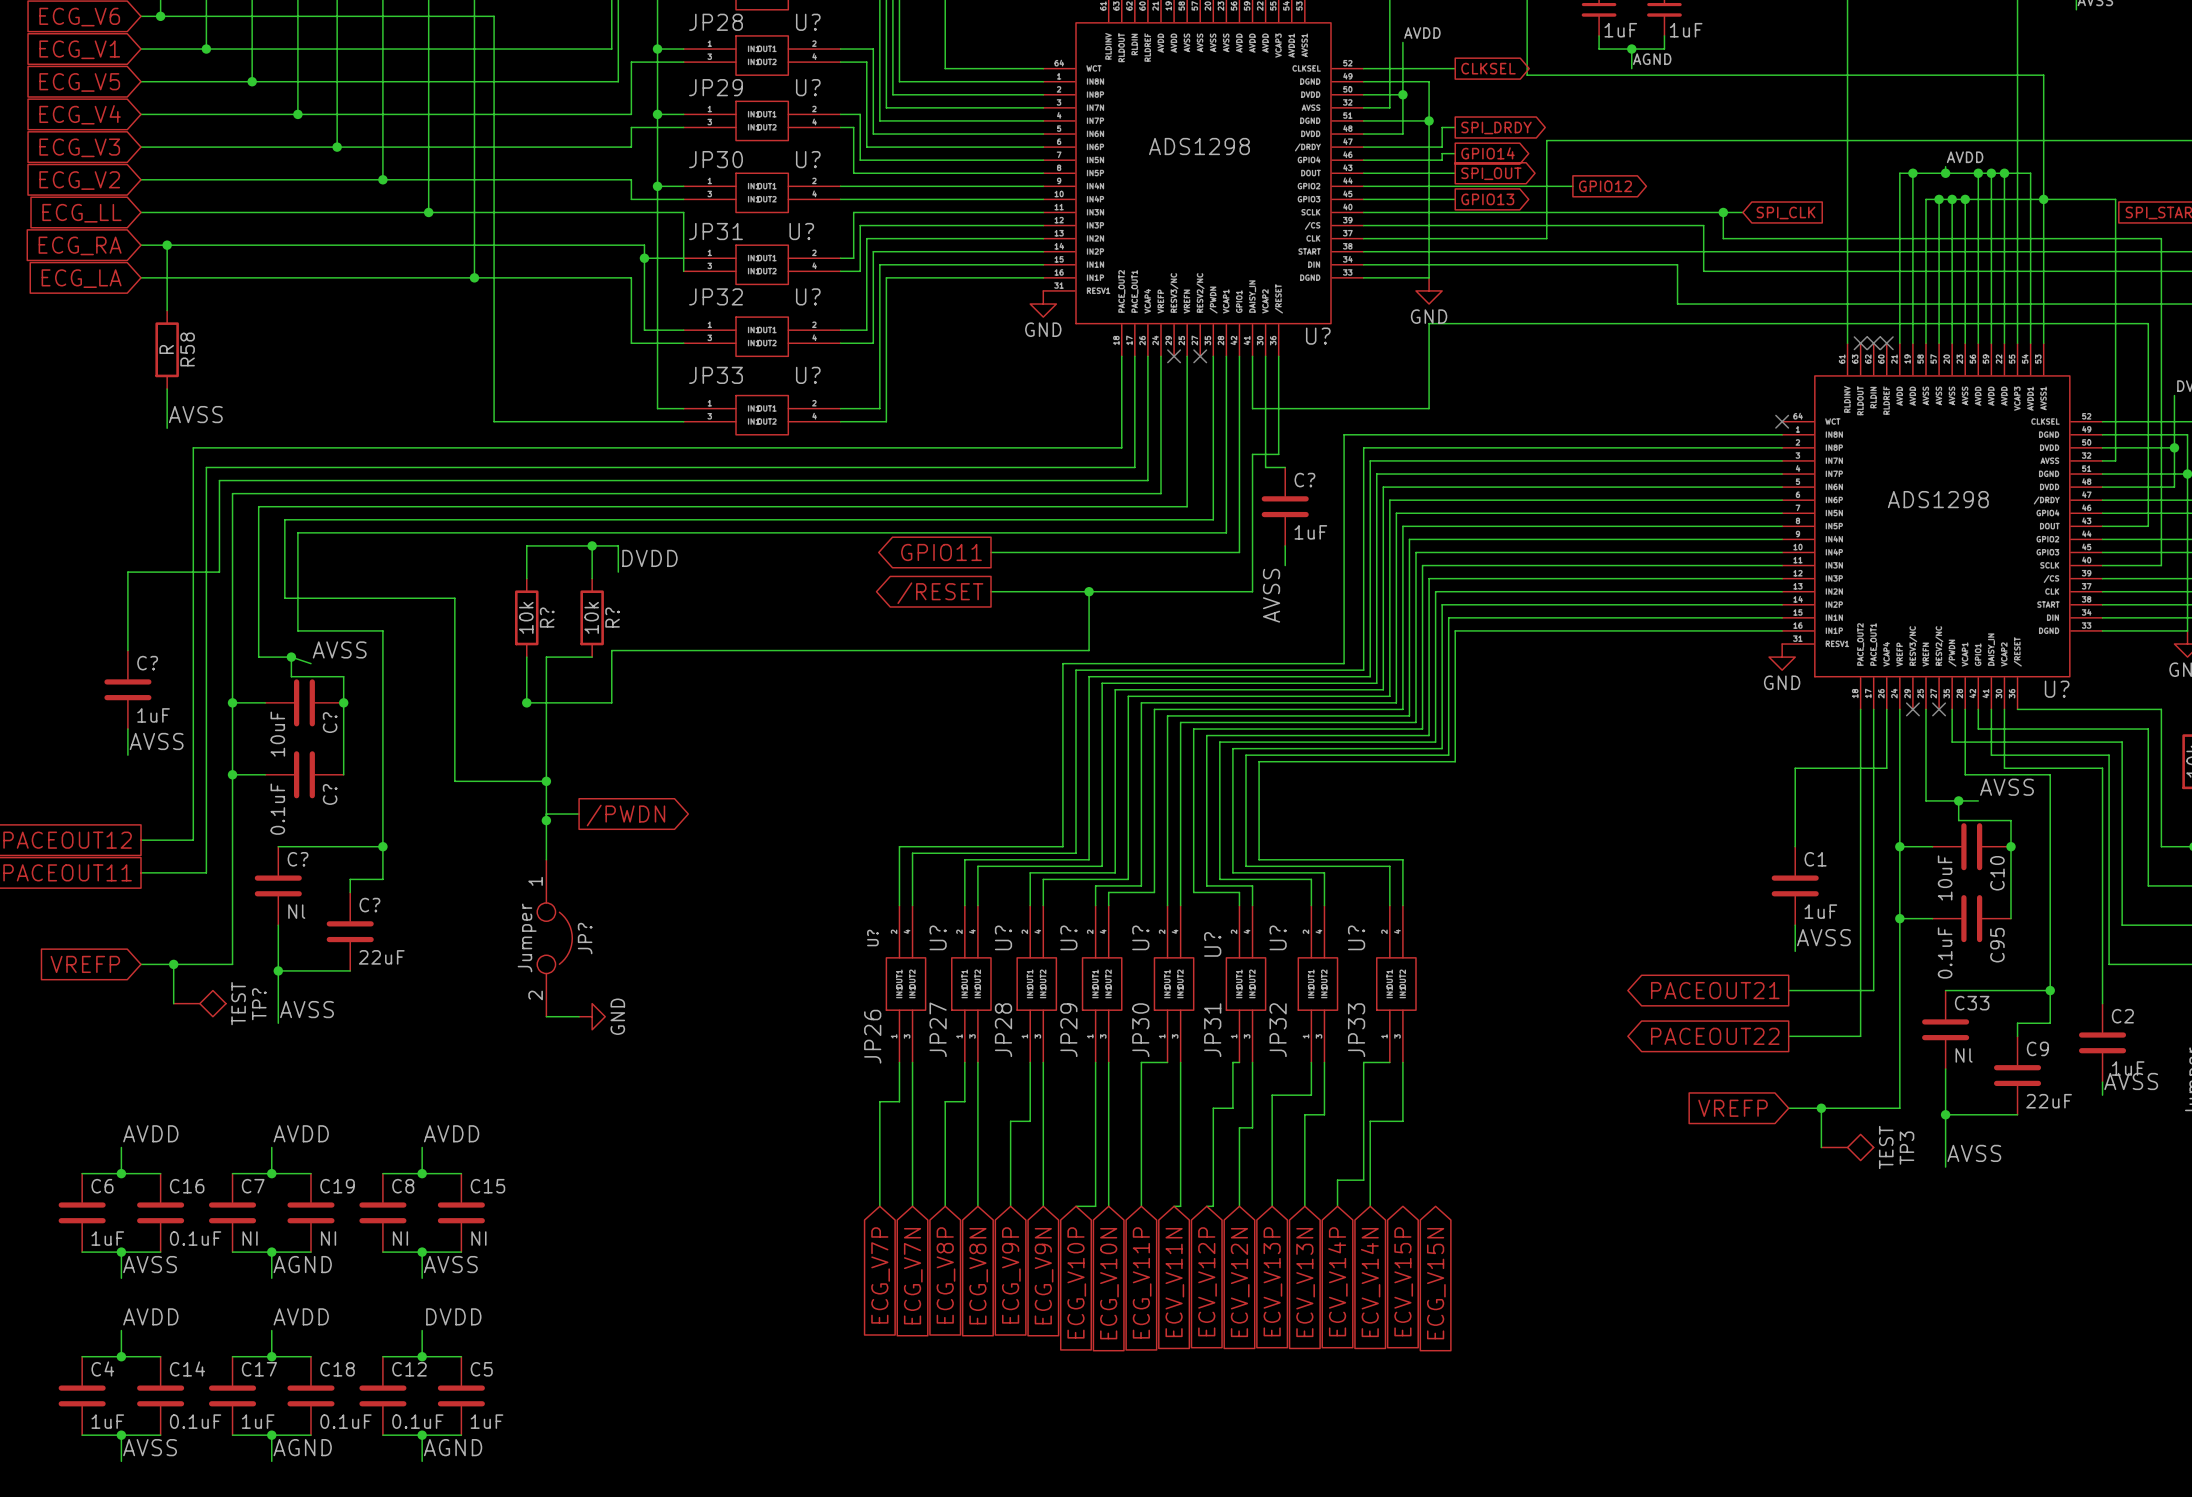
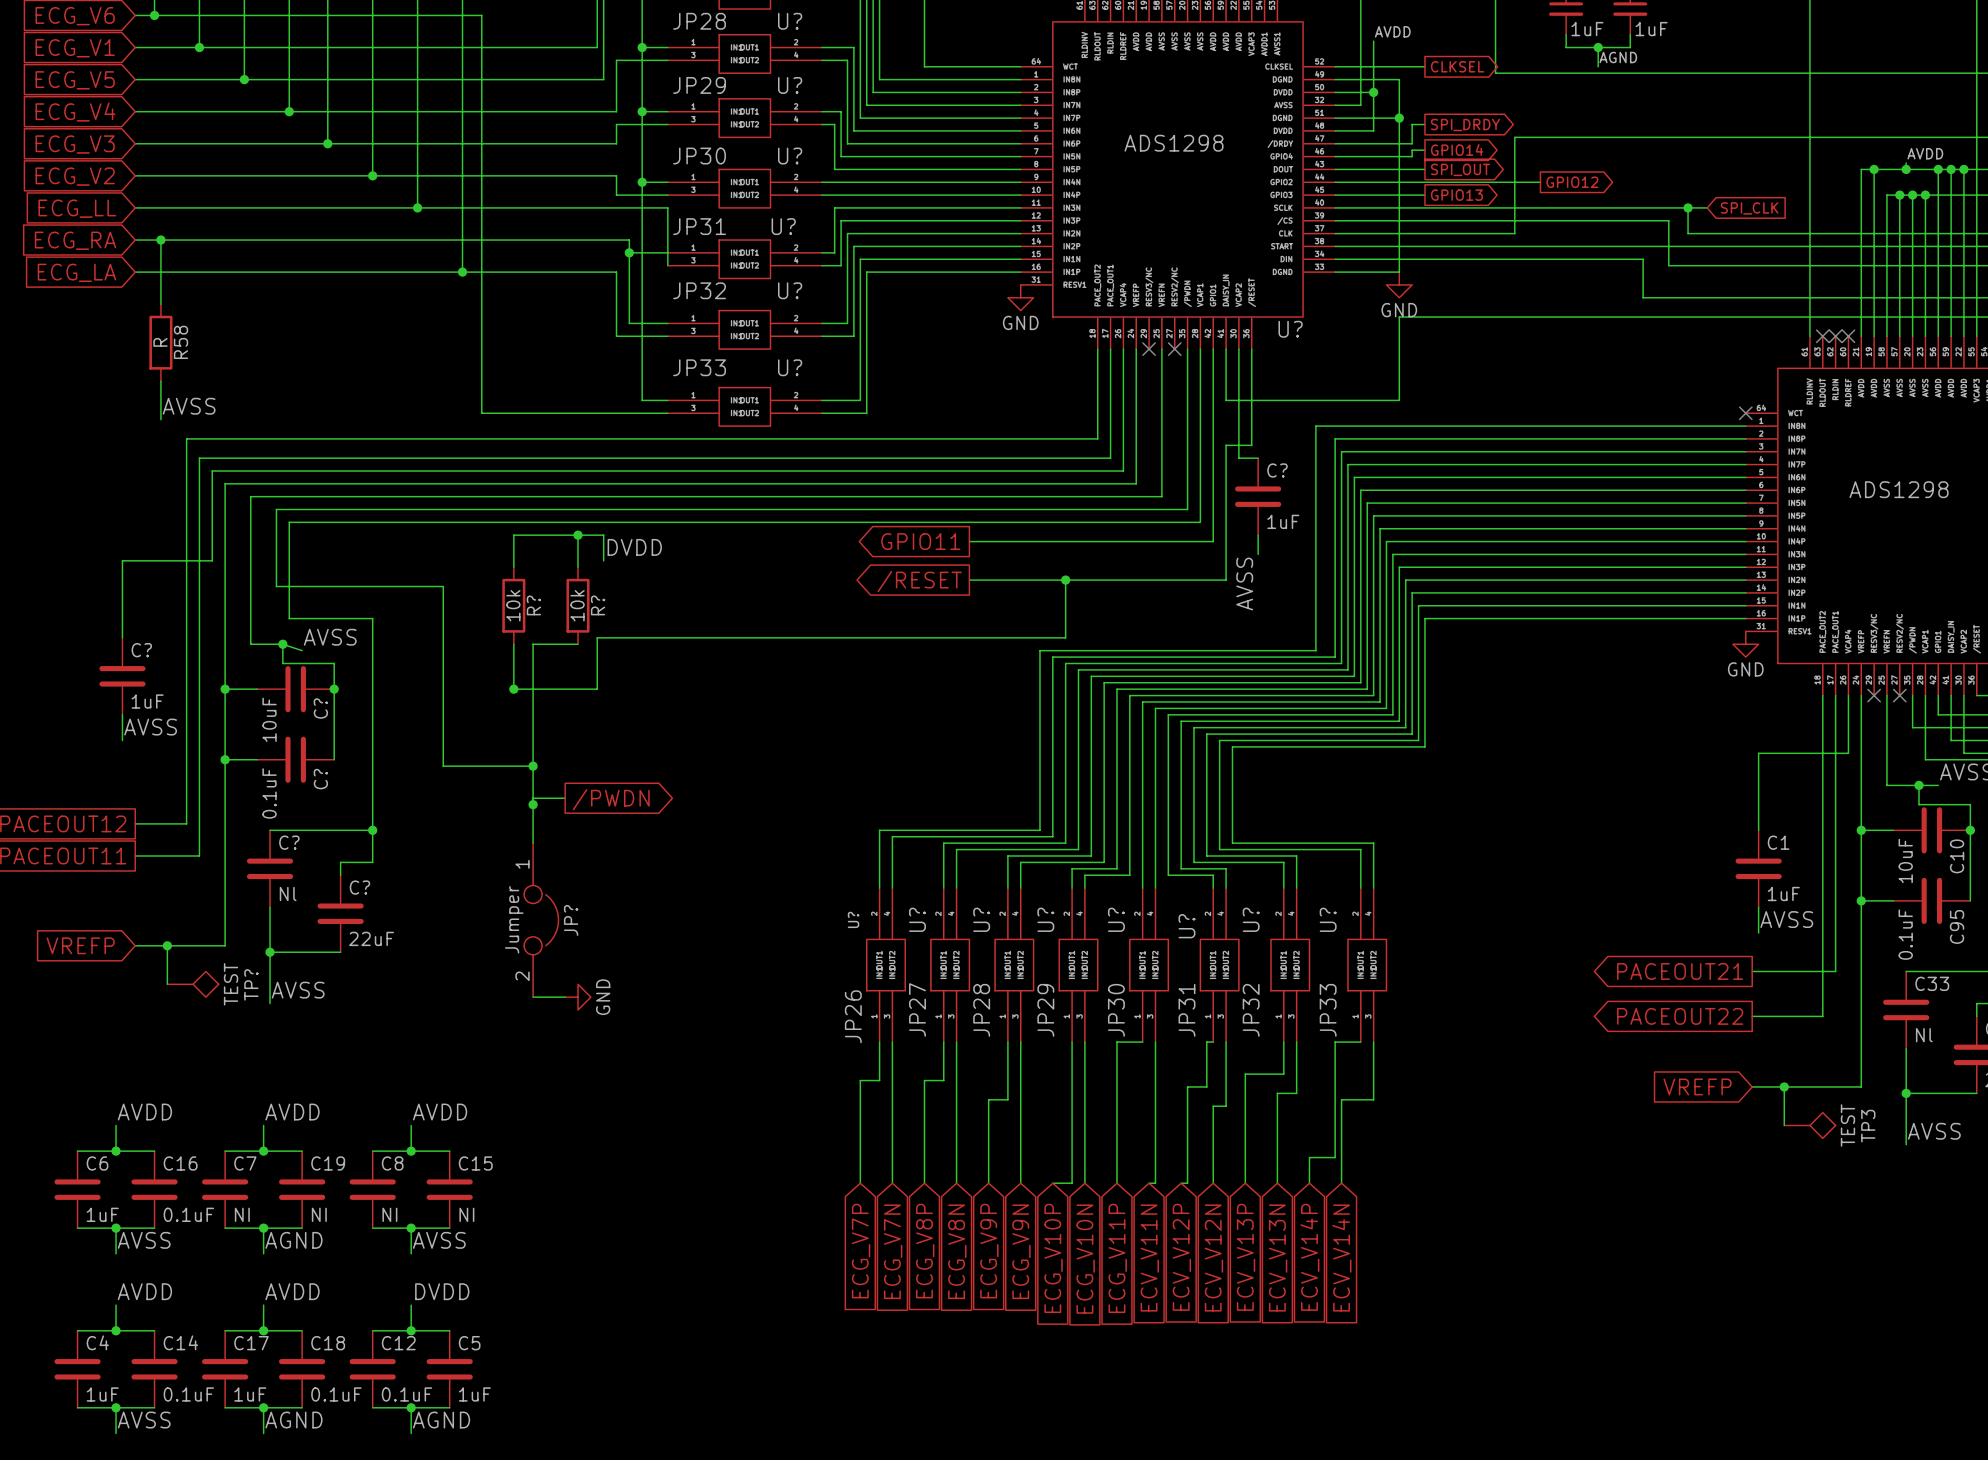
global label: ECV_V15P (1403, 1281) -> none
global label: ECG_V15N (1436, 1283) -> none

